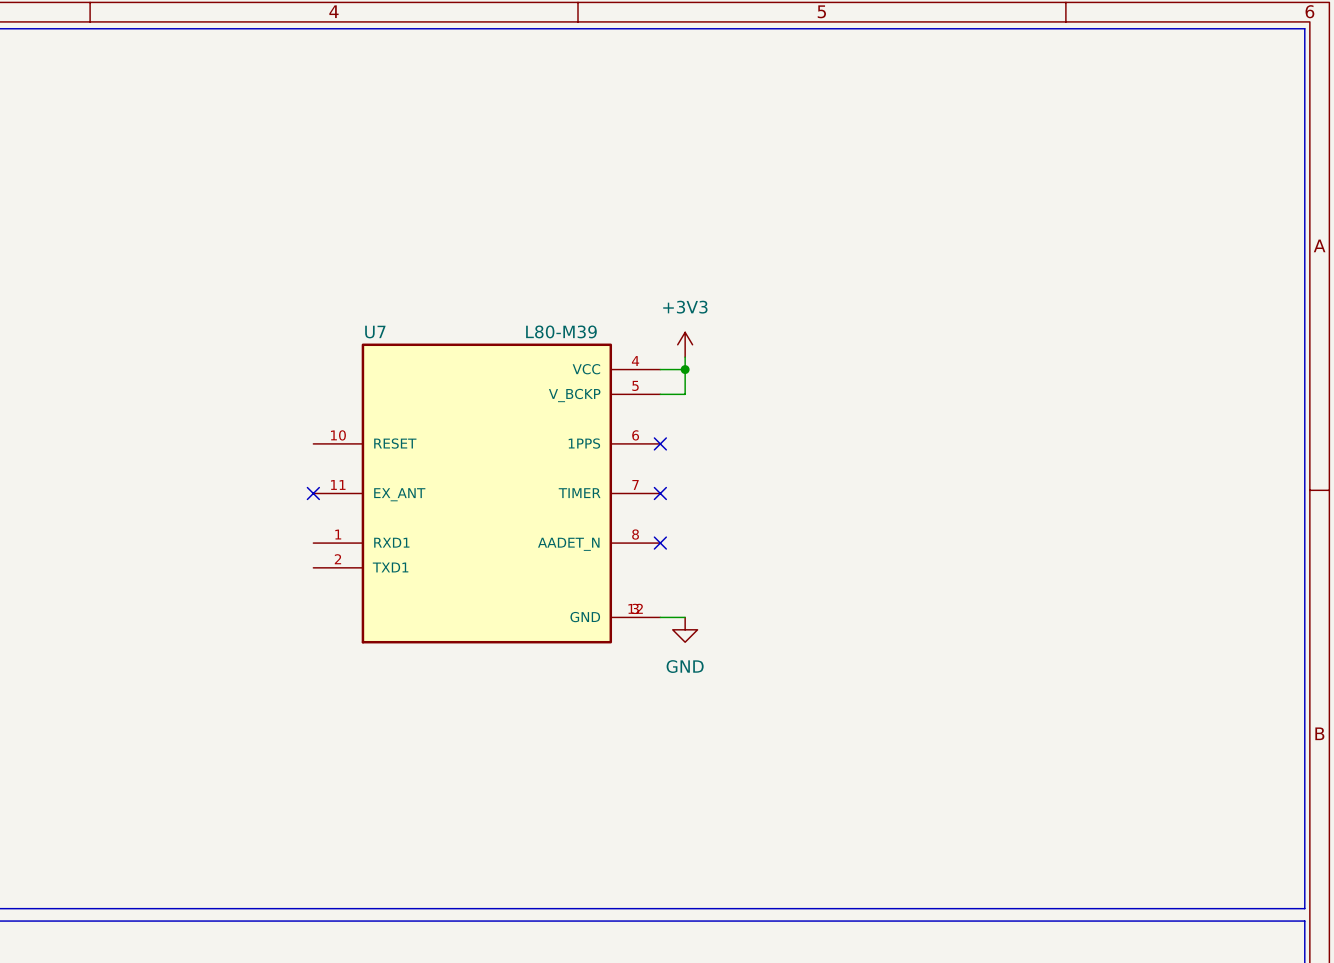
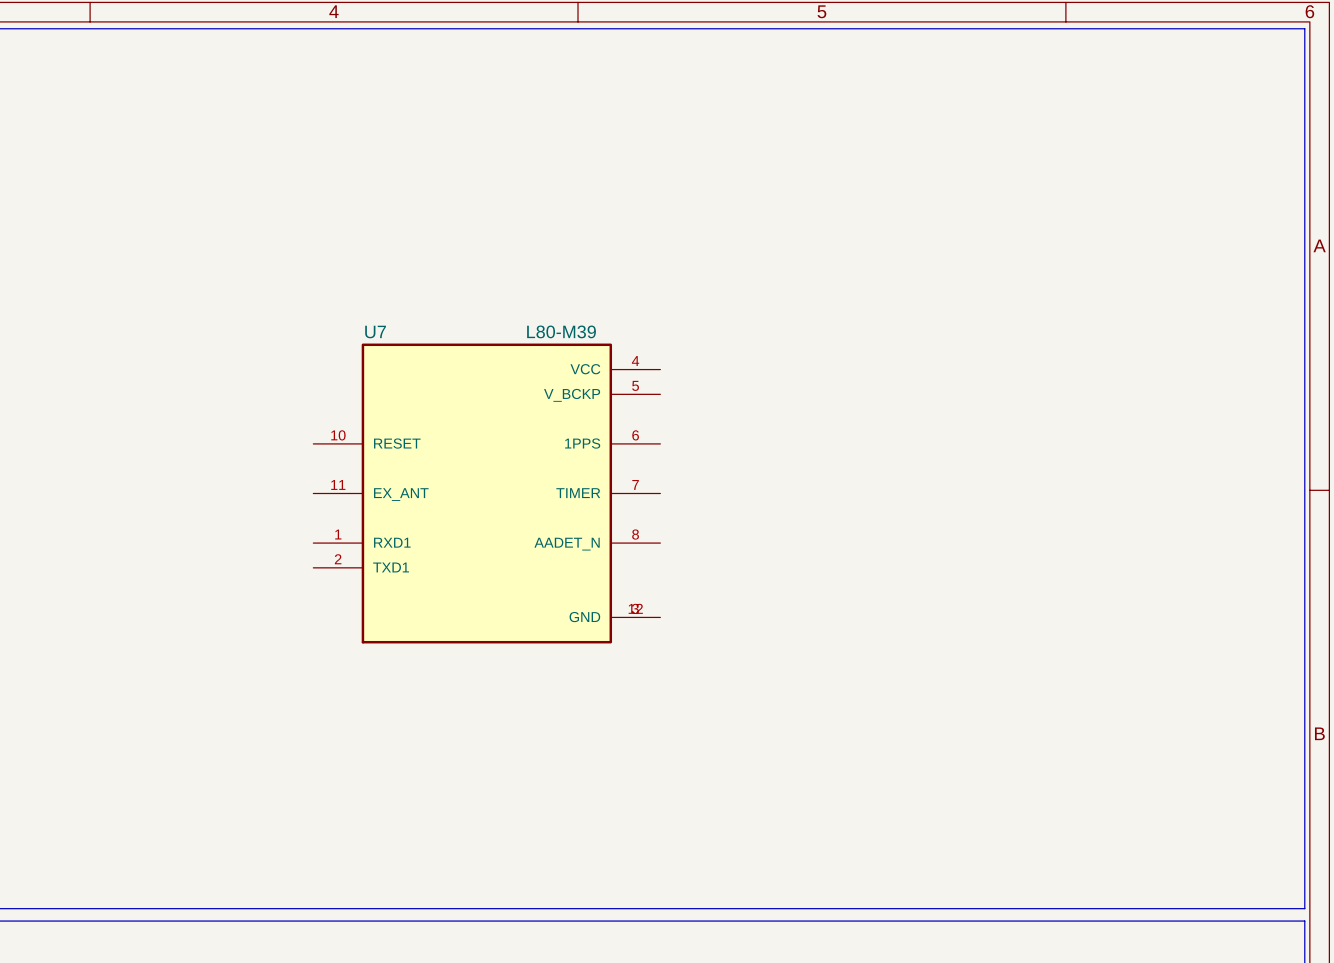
power symbol: +3V3 (685, 344) -> none
wire: (685, 357) (685, 394) (660, 394) -> none
wire: (660, 369) (685, 369) -> none
junction: (685, 369) -> none
no-connect mark: (660, 443) -> none
no-connect mark: (313, 493) -> none
no-connect mark: (660, 493) -> none
no-connect mark: (660, 543) -> none
wire: (660, 617) (685, 617) -> none
power symbol: GND (685, 629) -> none

